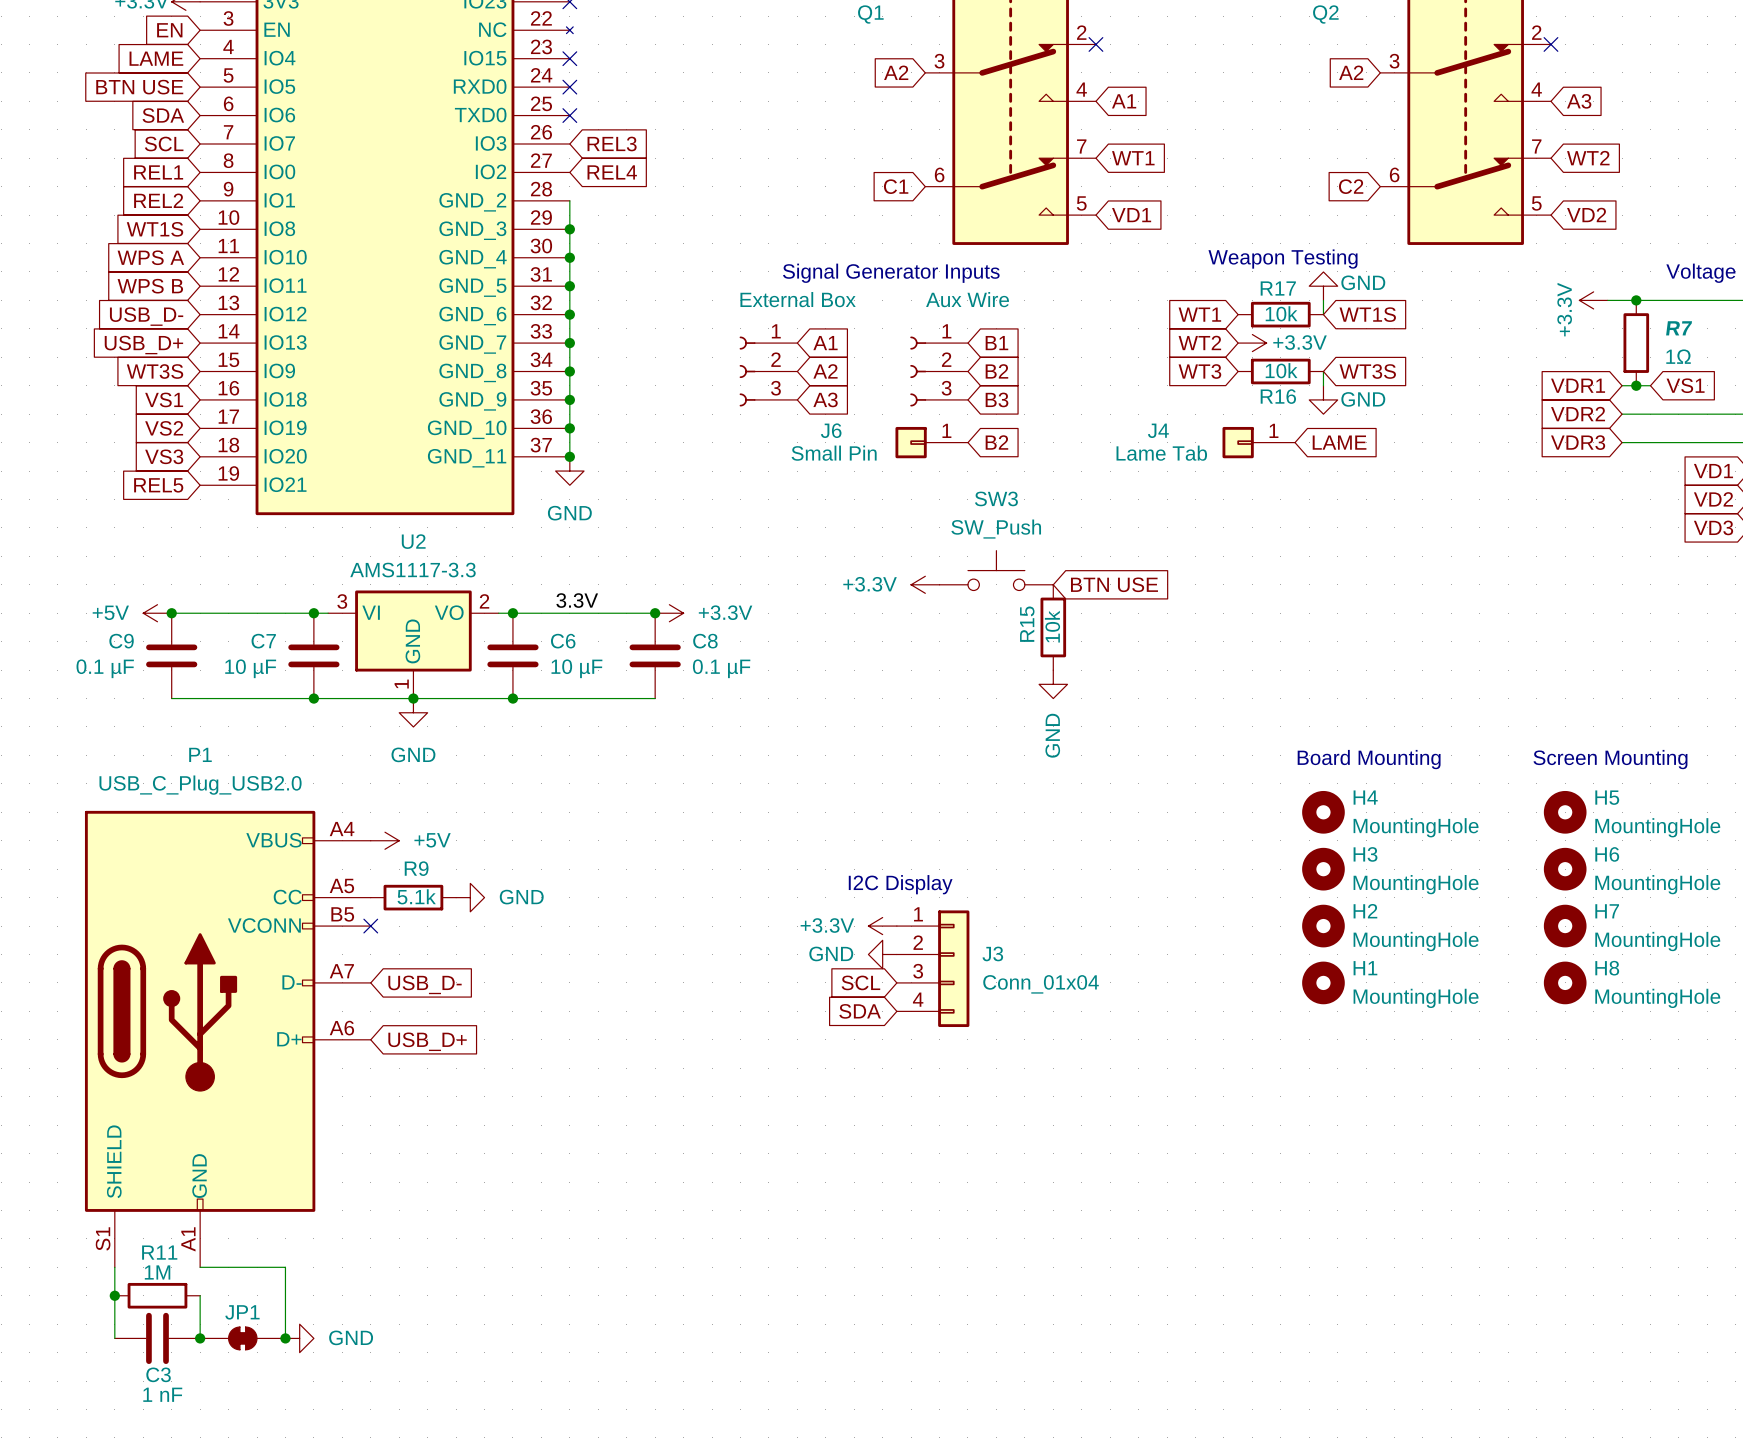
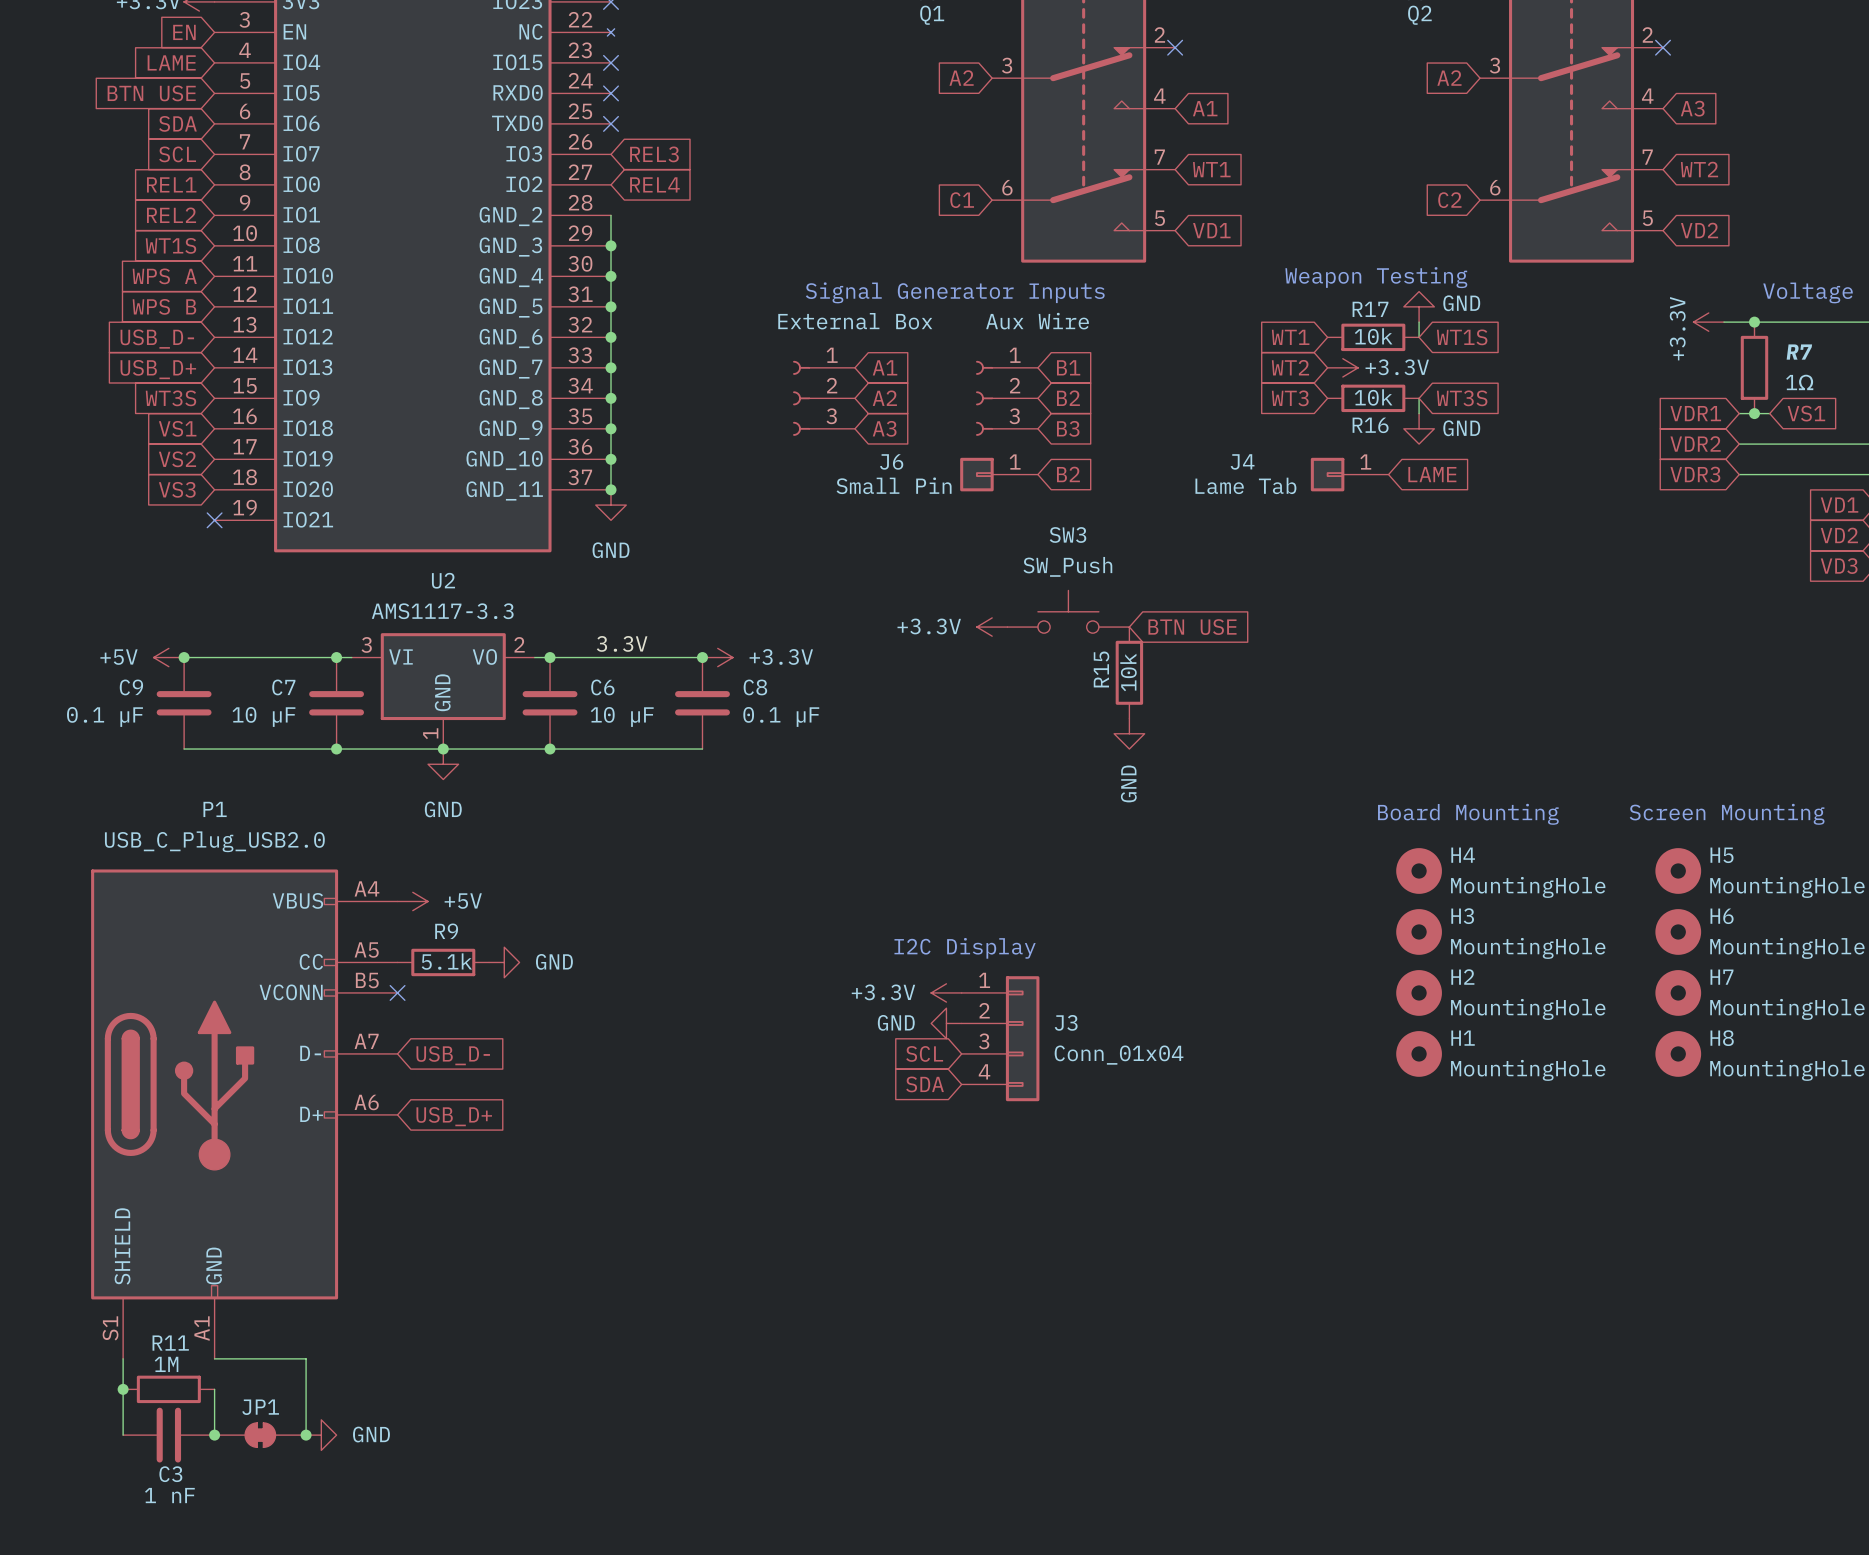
global label: REL5 (158, 485) -> none
no-connect mark: none -> (214, 520)

